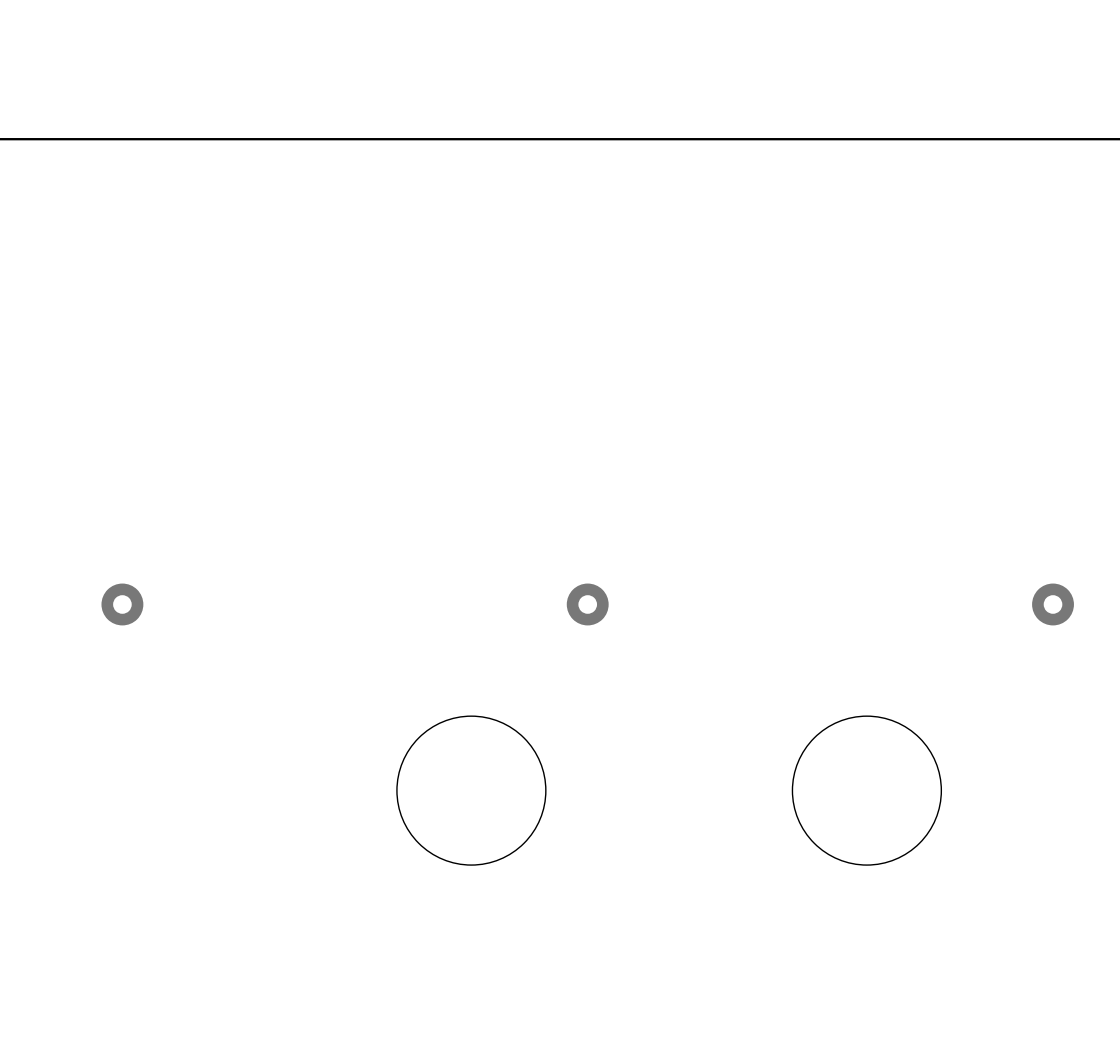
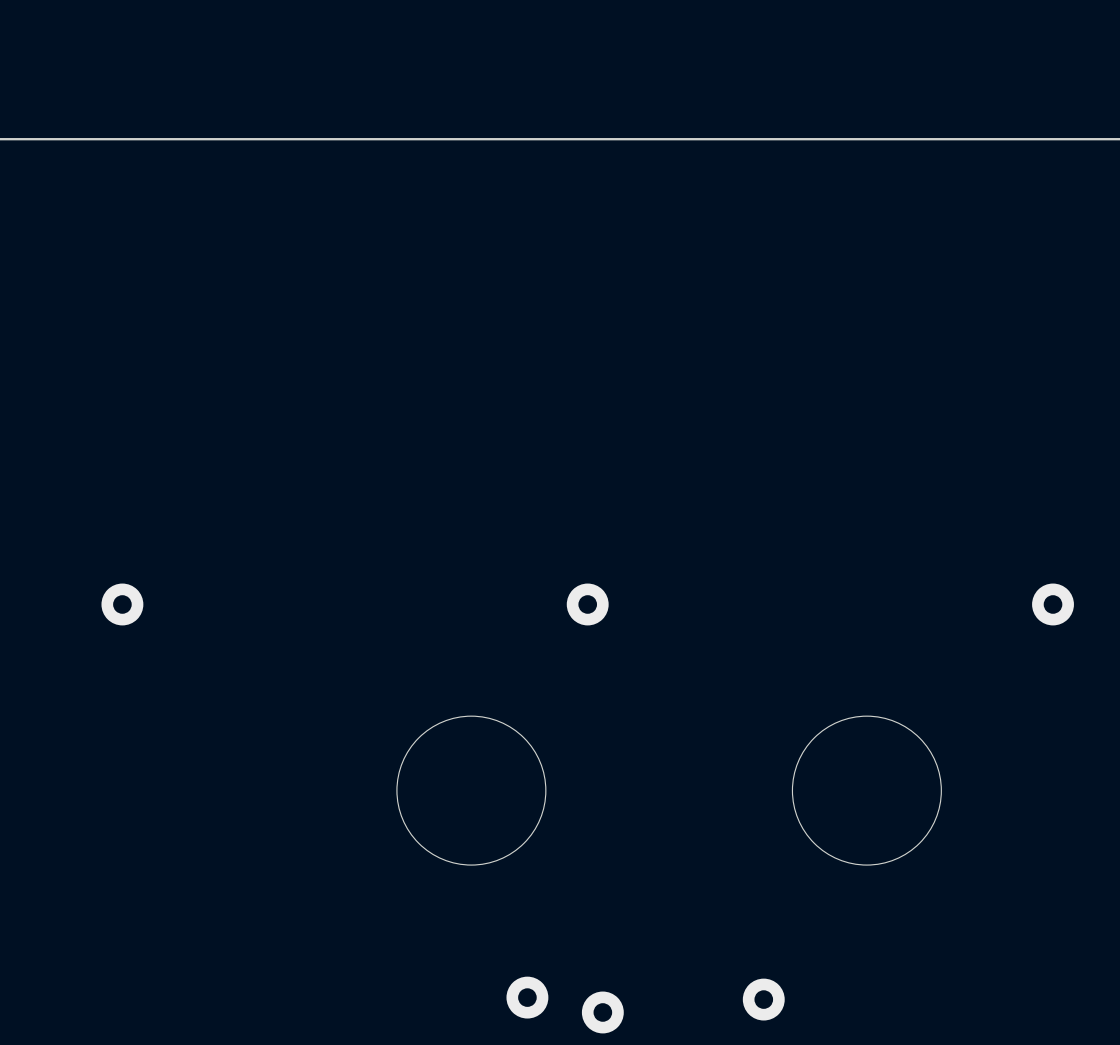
via: none -> (527, 997)
via: none -> (763, 999)
via: none -> (602, 1012)

